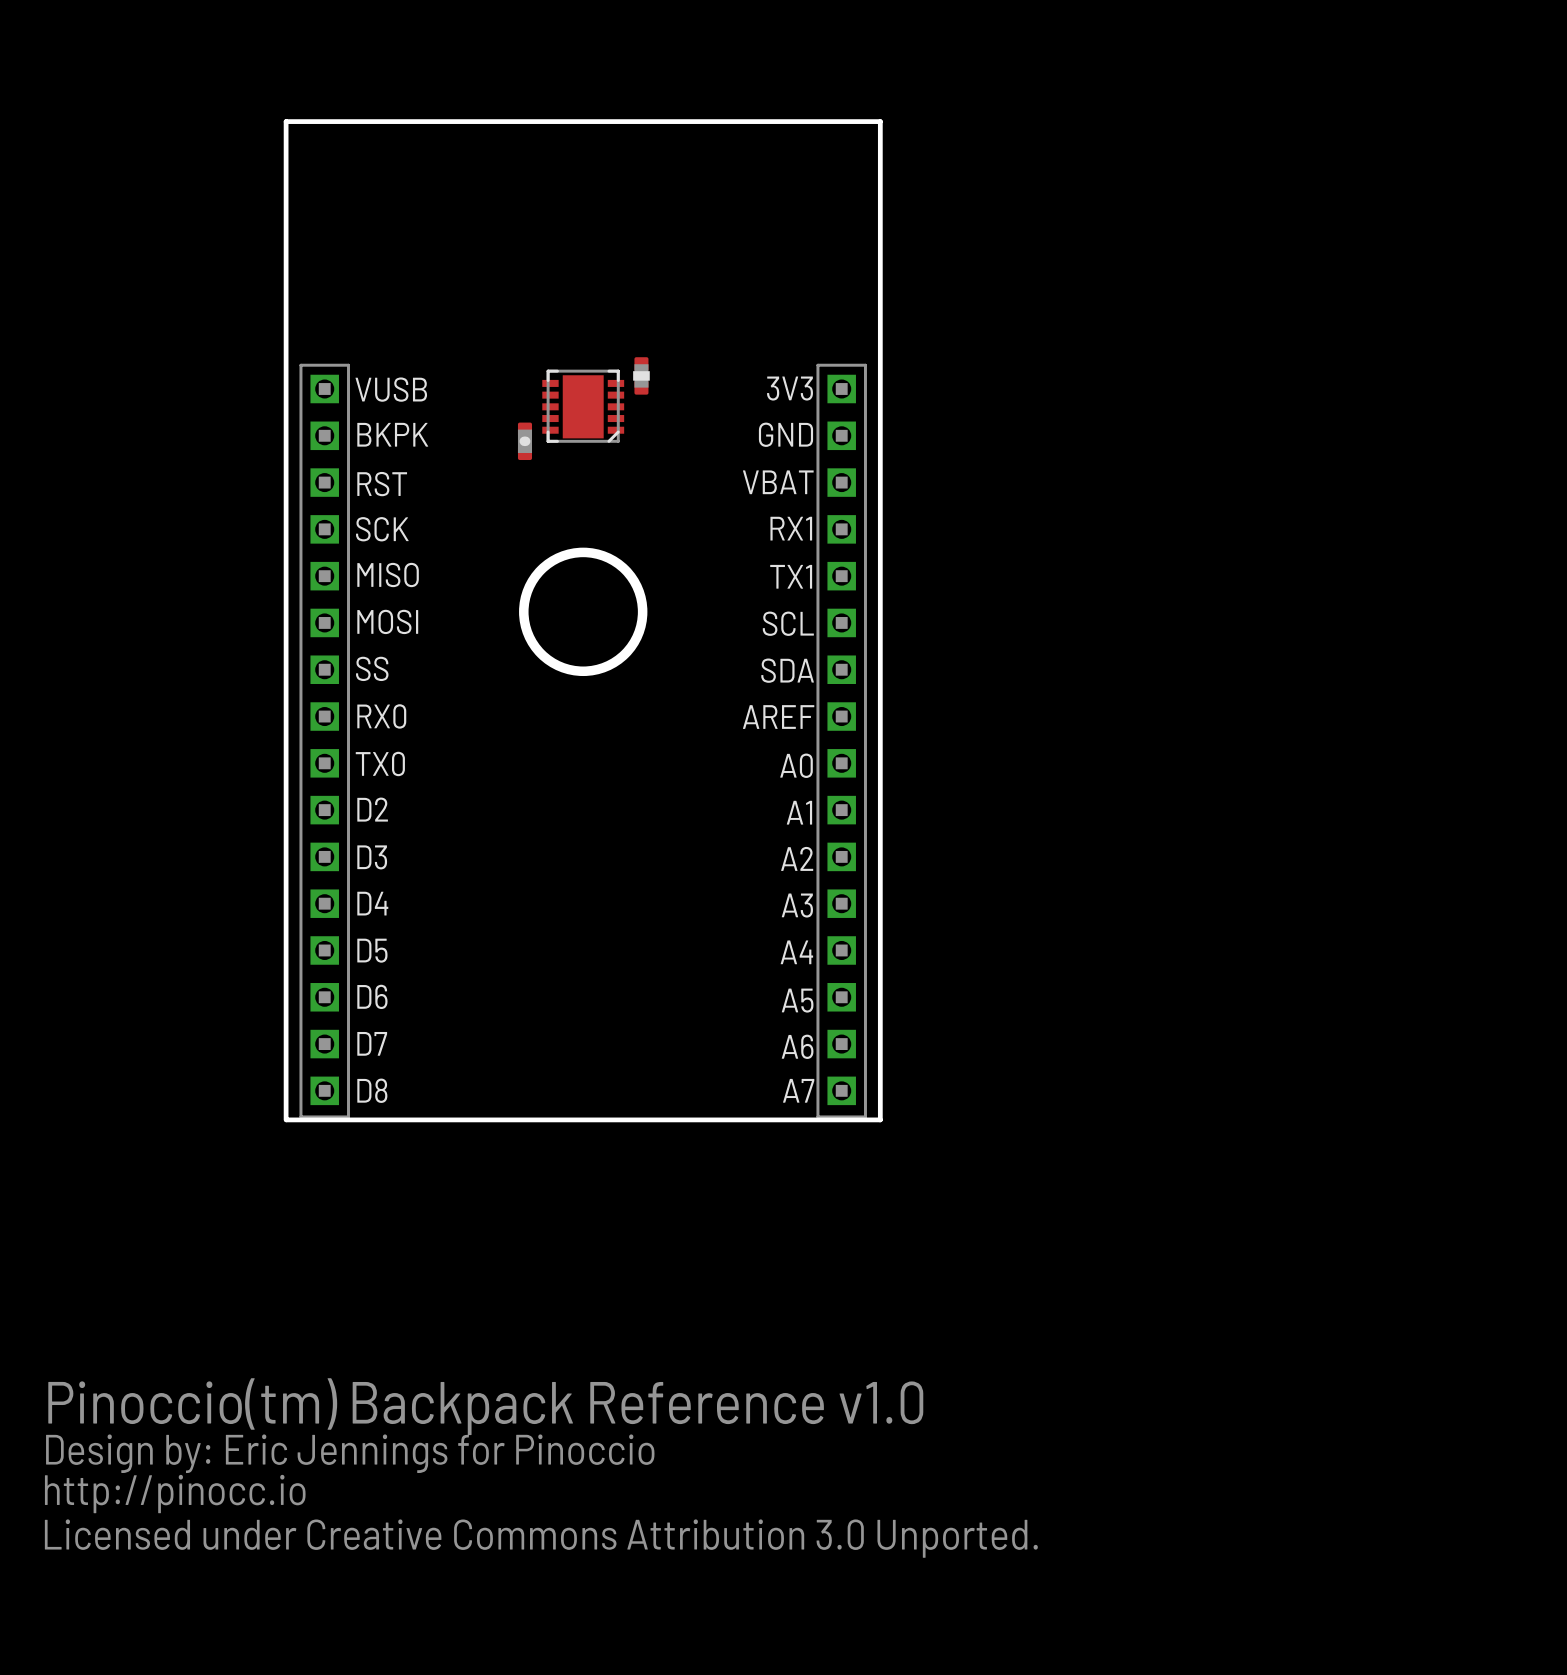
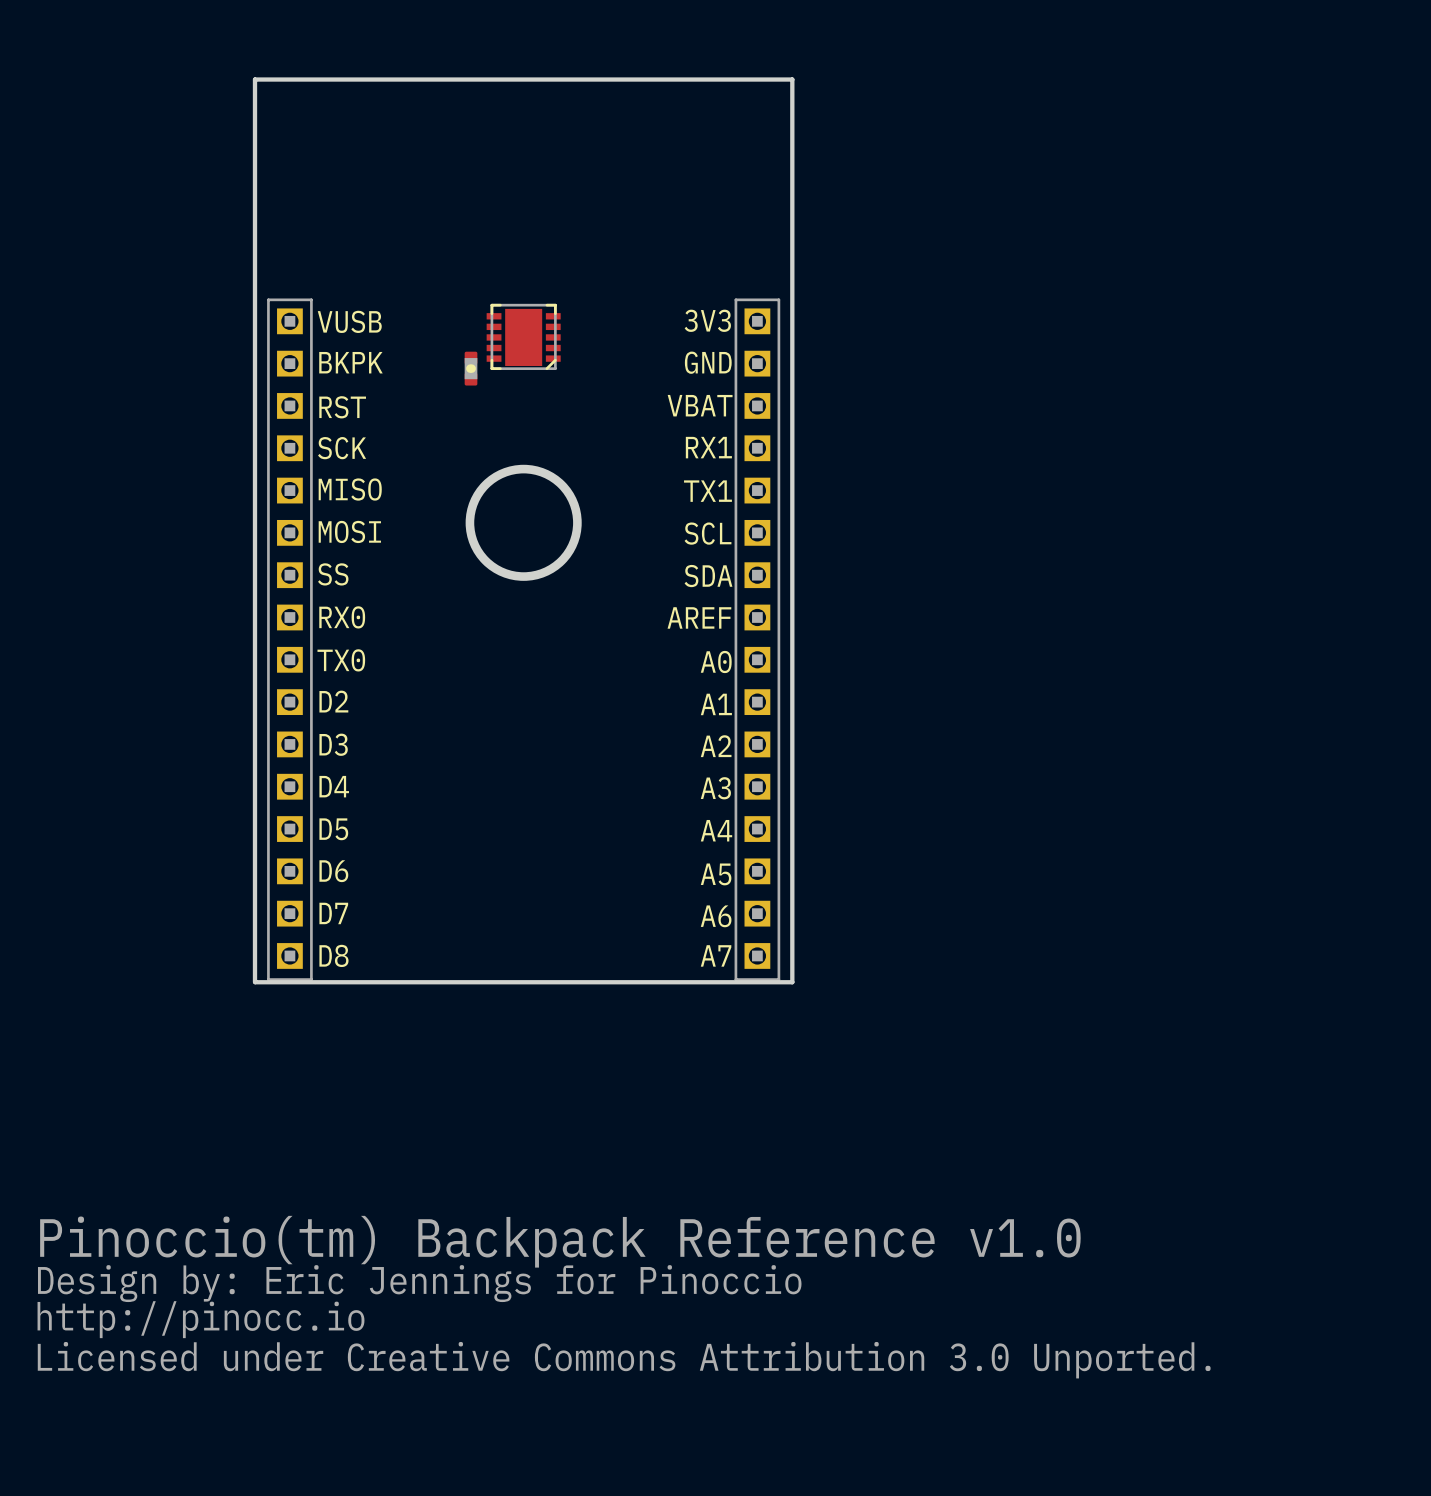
part: (641, 375) -> none

